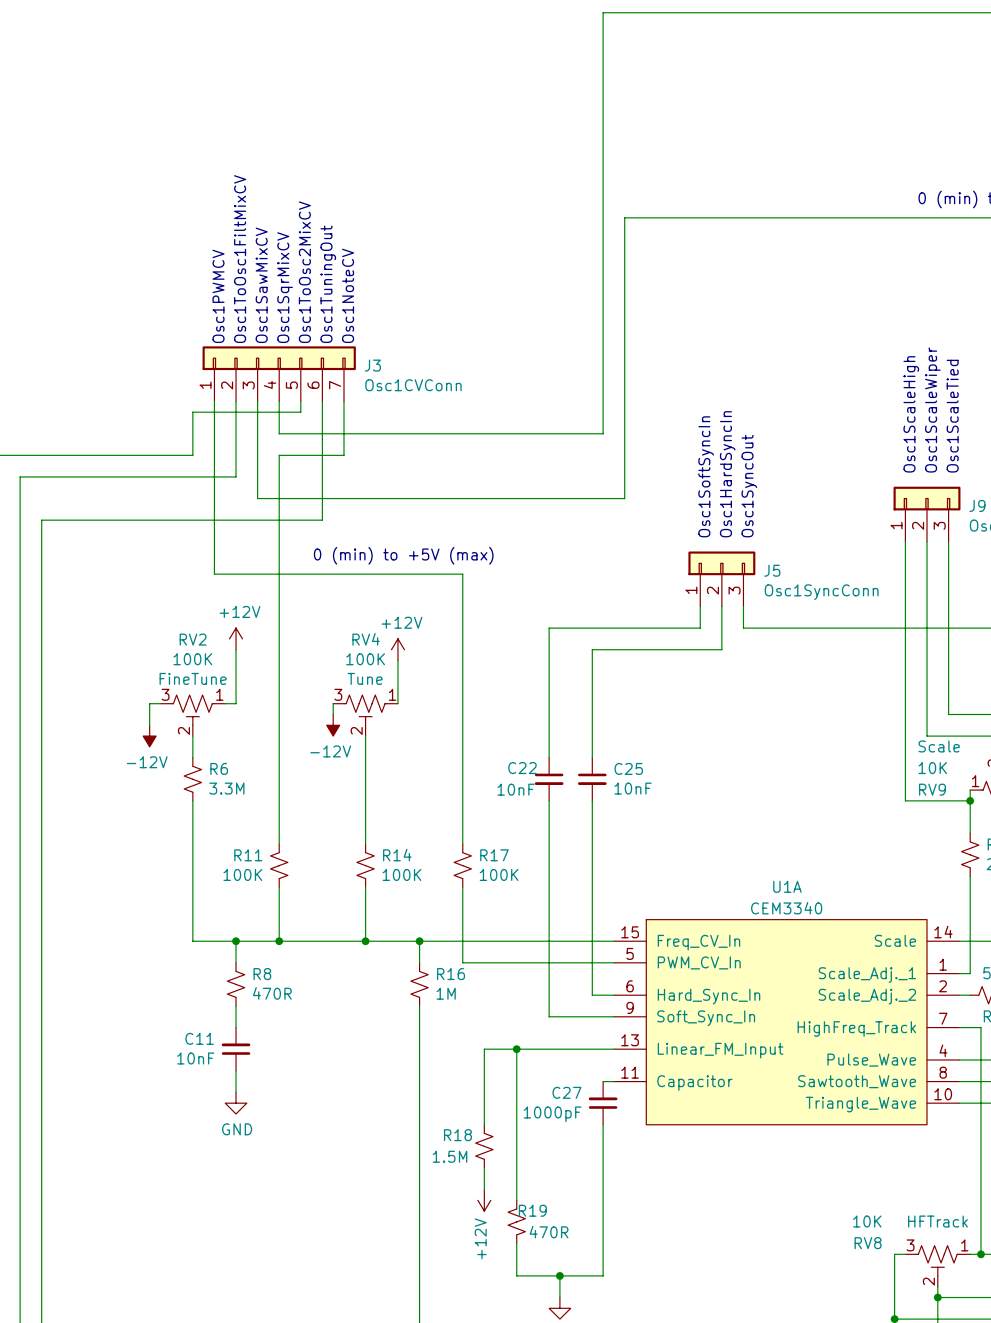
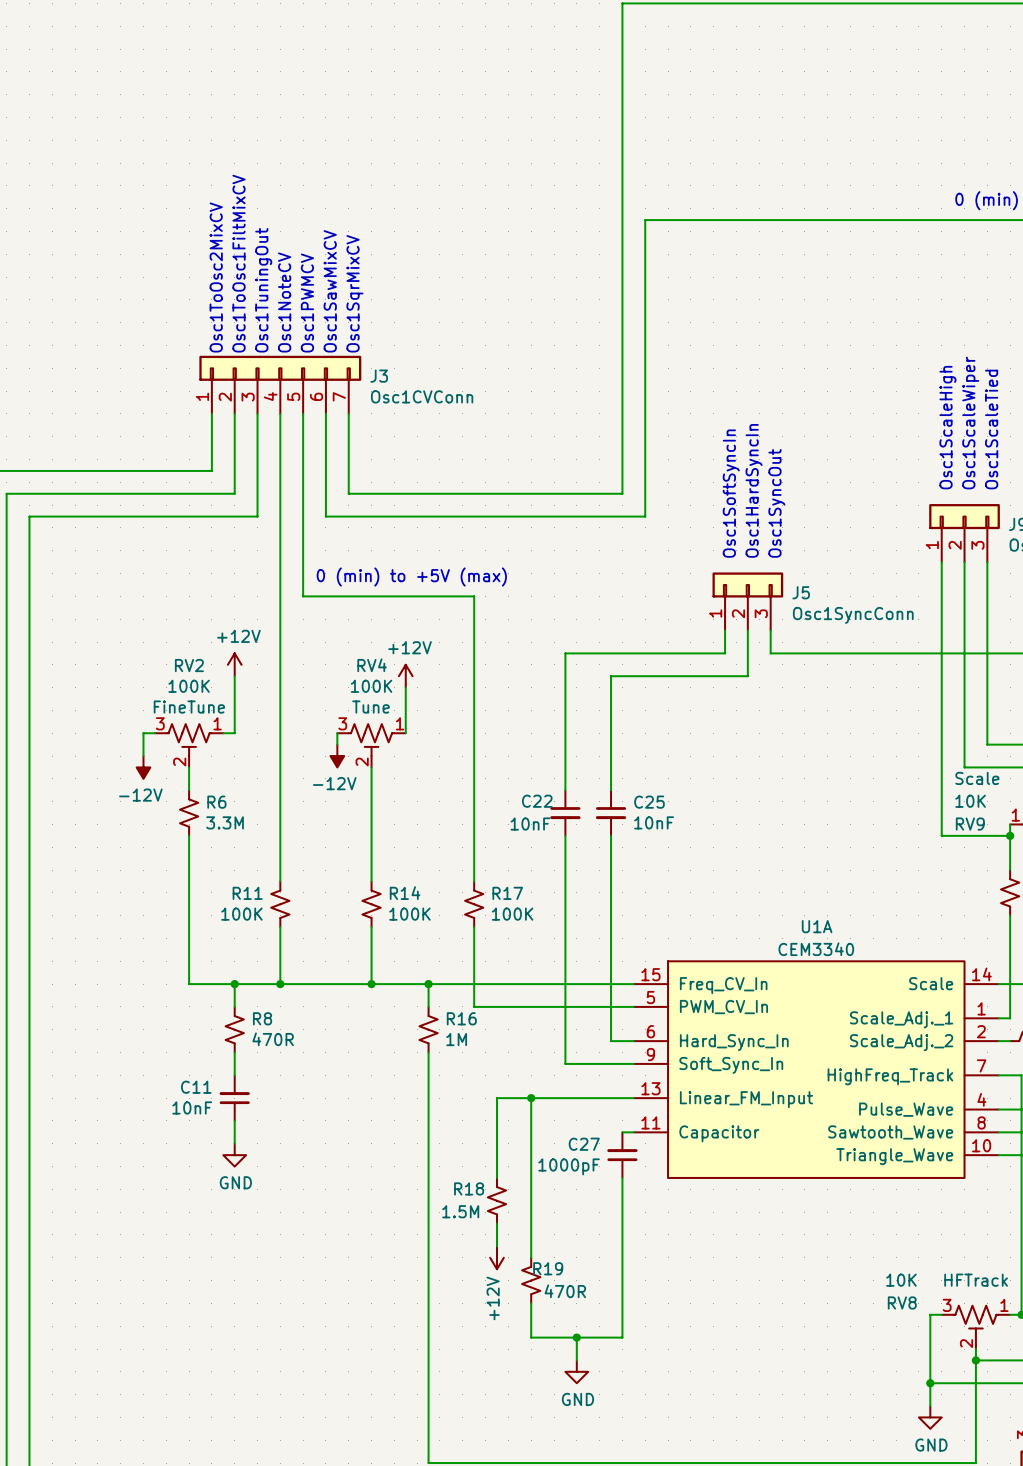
text: Osc1ToOsc2MixCV (304, 272) -> Osc1PWMCV (307, 303)
text: Osc1TuningOut (328, 284) -> Osc1SawMixCV (330, 291)
text: Osc1SawMixCV (261, 285) -> Osc1TuningOut (263, 290)
text: Osc1SqrMixCV (285, 287) -> Osc1NoteCV (284, 302)
text: Osc1NoteCV (348, 295) -> Osc1SqrMixCV (354, 293)
text: Osc1PWMCV (218, 296) -> Osc1ToOsc2MixCV (216, 277)
wire: (300, 412) (192, 412) (192, 455) -> (211, 470) (189, 470)
wire: (279, 433) (603, 433) -> (348, 470) (348, 493) (622, 493) (622, 448)
wire: (214, 455) (214, 574) (300, 574) -> (303, 425) (303, 596)
wire: (279, 455) (343, 455) -> (280, 470) (280, 448)
wire: (257, 498) (322, 498) (322, 520) (41, 520) -> (257, 516) (29, 516) (29, 539)

